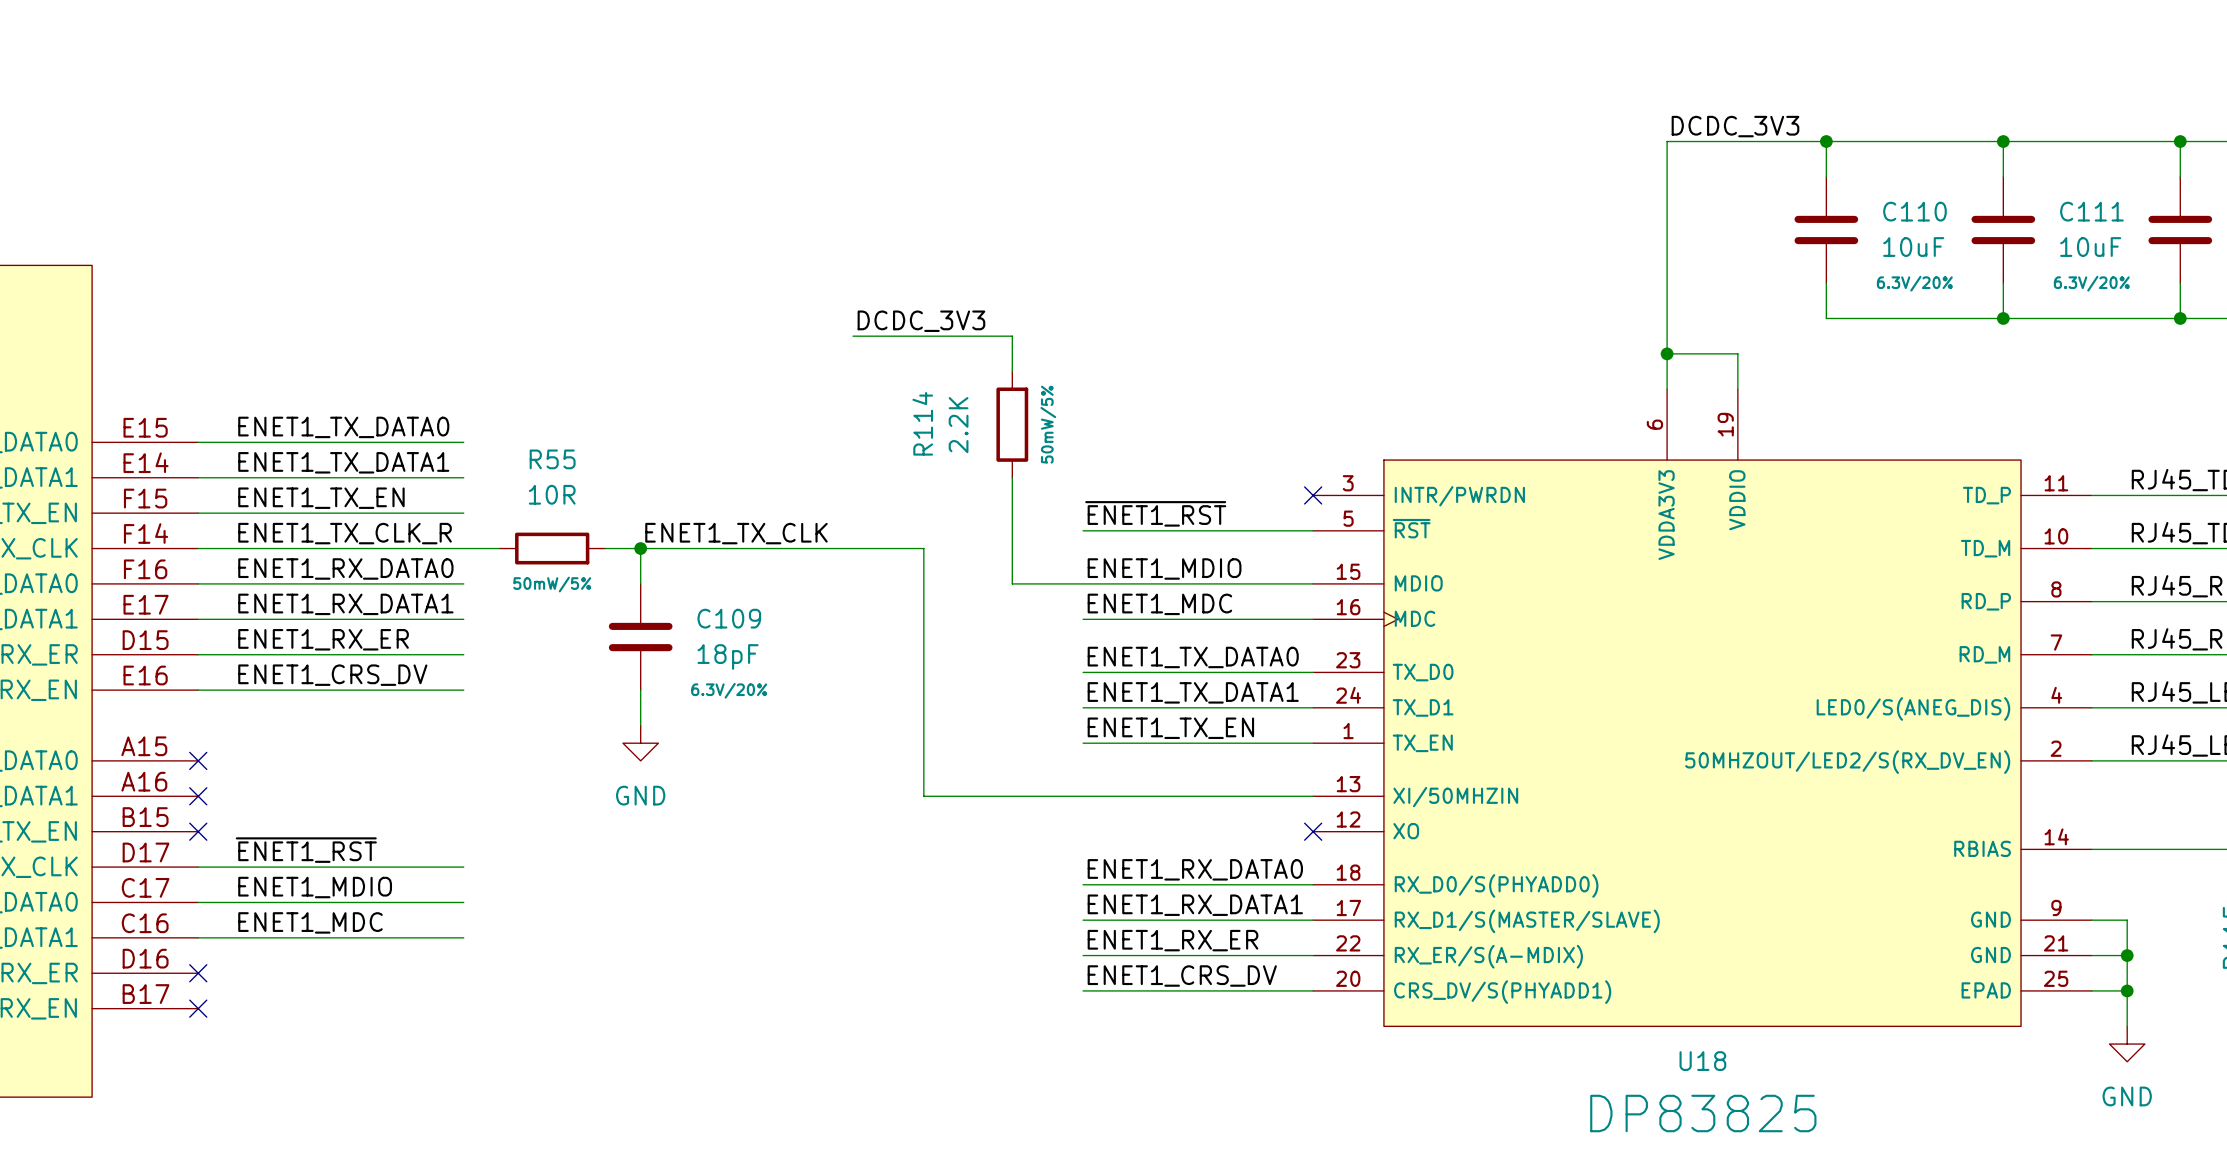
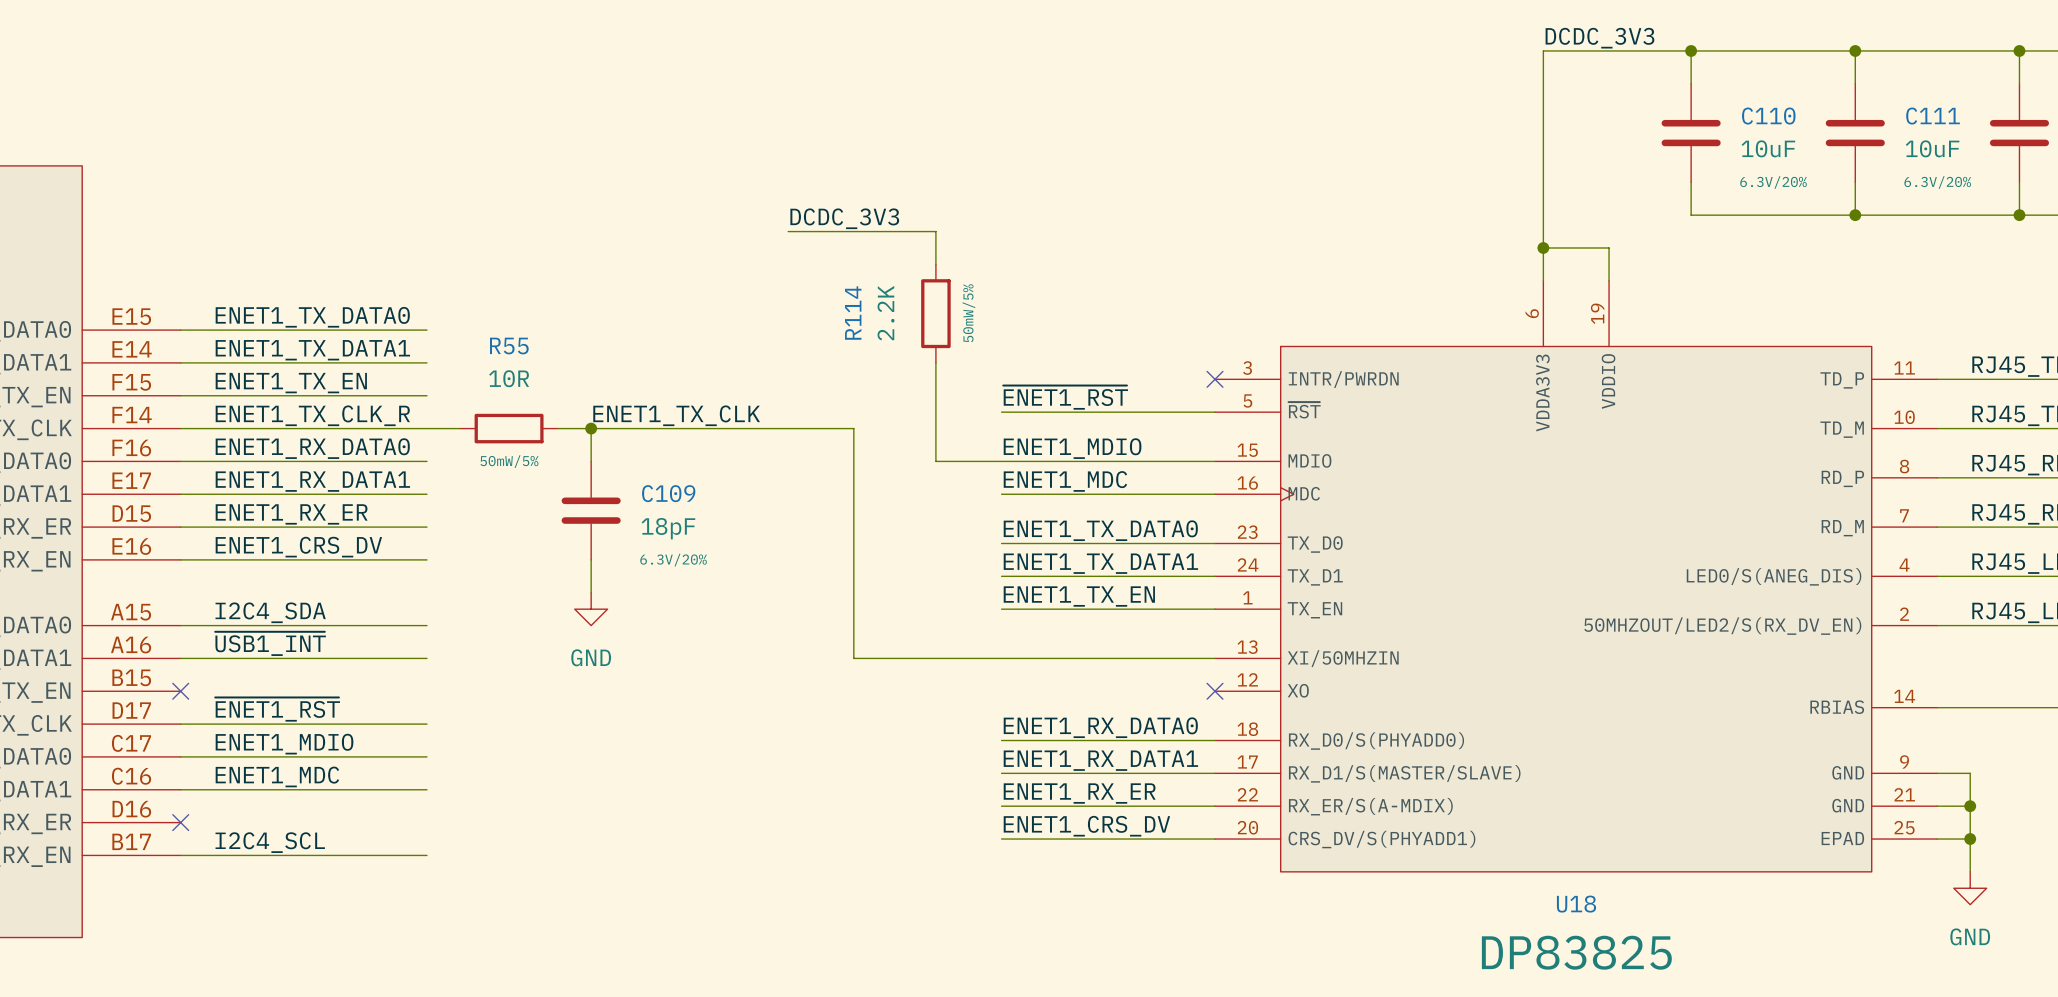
label: none -> I2C4_SDA (270, 612)
wire: none -> (180, 625) (426, 625)
no-connect mark: (198, 760) -> none
label: none -> ~{USB1_INT} (270, 643)
wire: none -> (180, 658) (426, 658)
no-connect mark: (198, 796) -> none
label: none -> I2C4_SCL (270, 842)
wire: none -> (180, 855) (426, 855)
no-connect mark: (198, 1008) -> none

